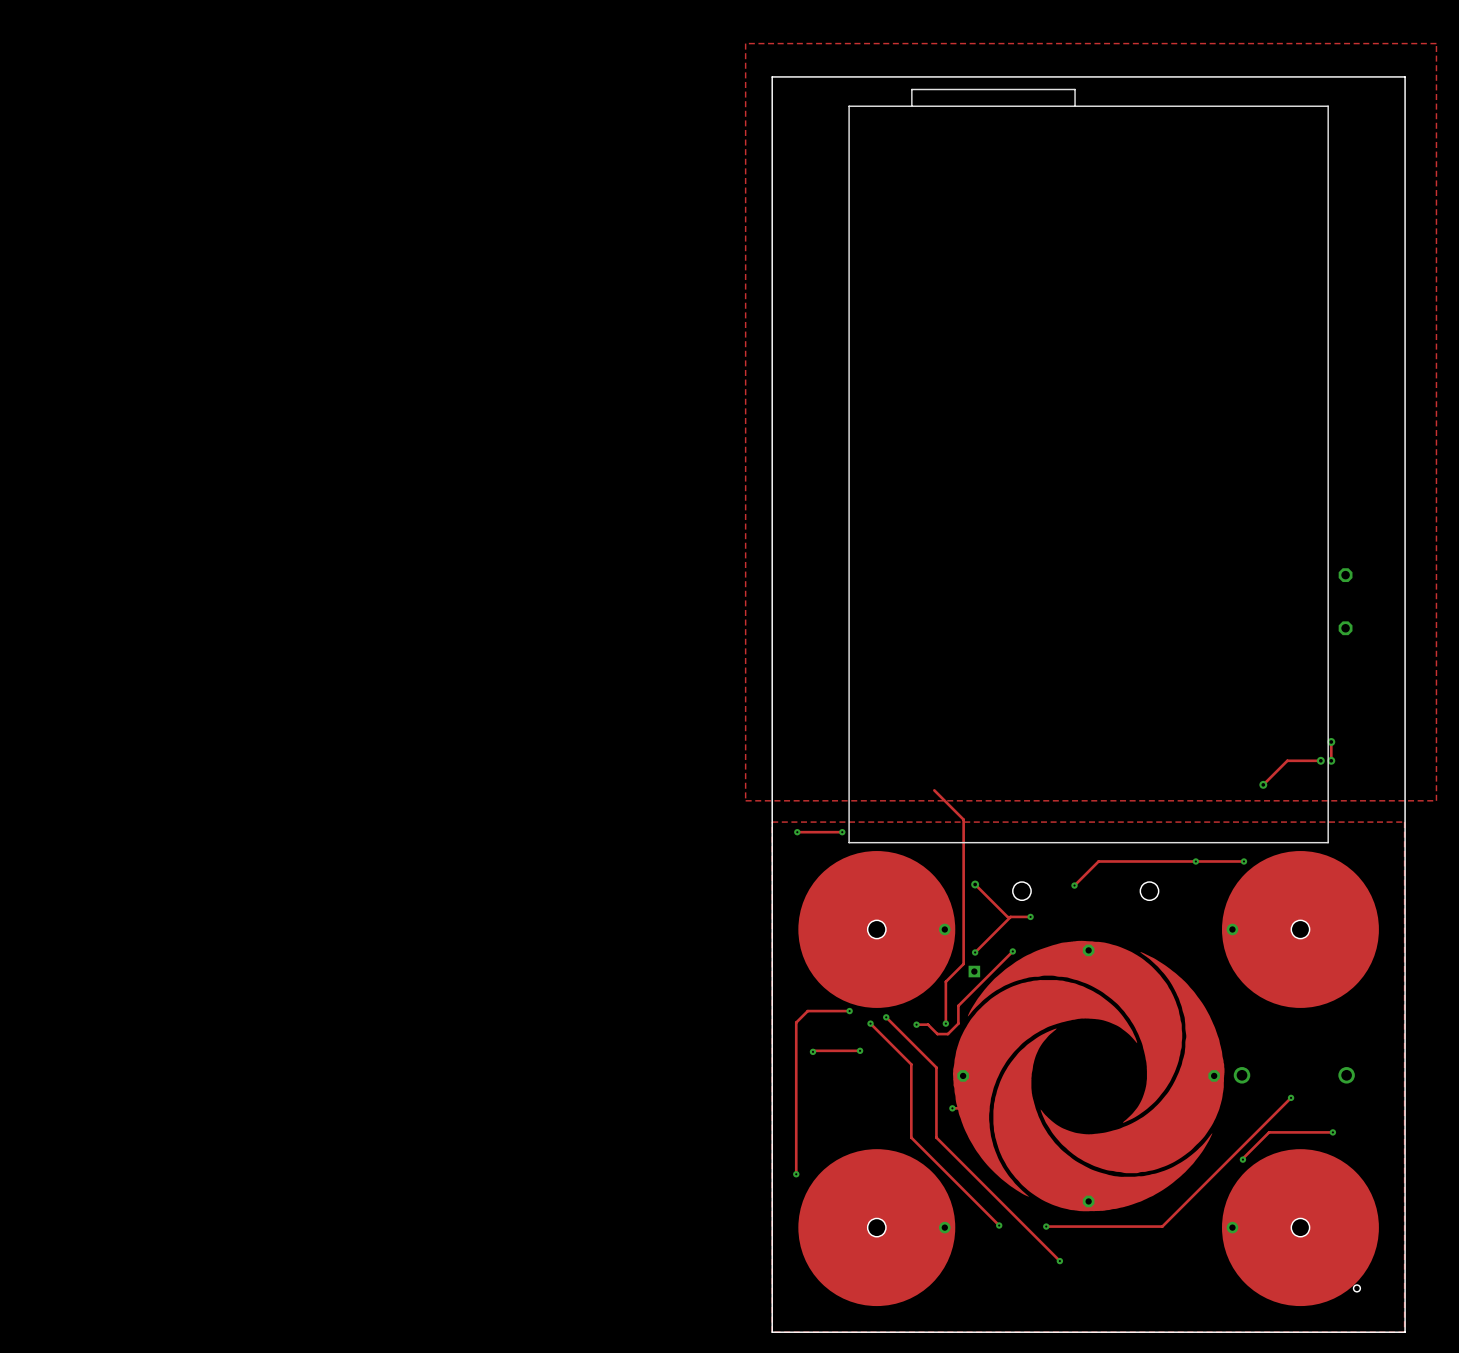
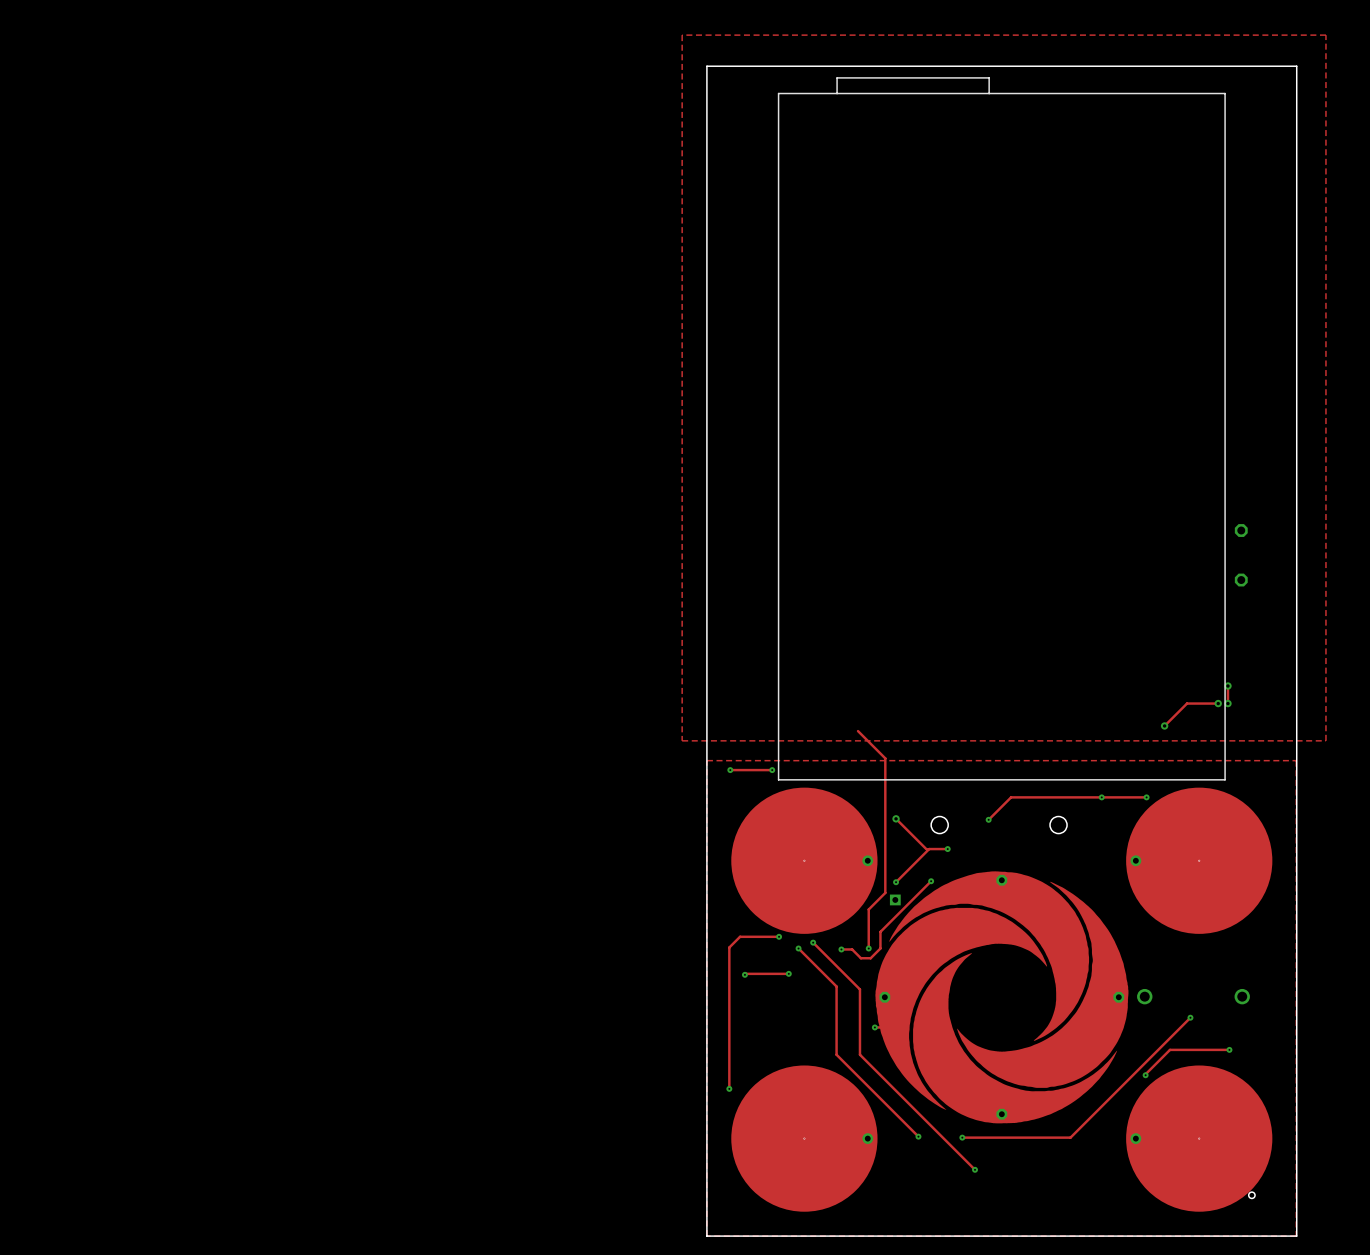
part footprint: [798, 851, 956, 1008] -> [731, 787, 878, 934]
part footprint: [1222, 851, 1379, 1008] -> [1126, 787, 1273, 934]
part footprint: [798, 1149, 956, 1307] -> [731, 1065, 878, 1212]
part footprint: [1222, 1149, 1379, 1307] -> [1126, 1065, 1273, 1212]

